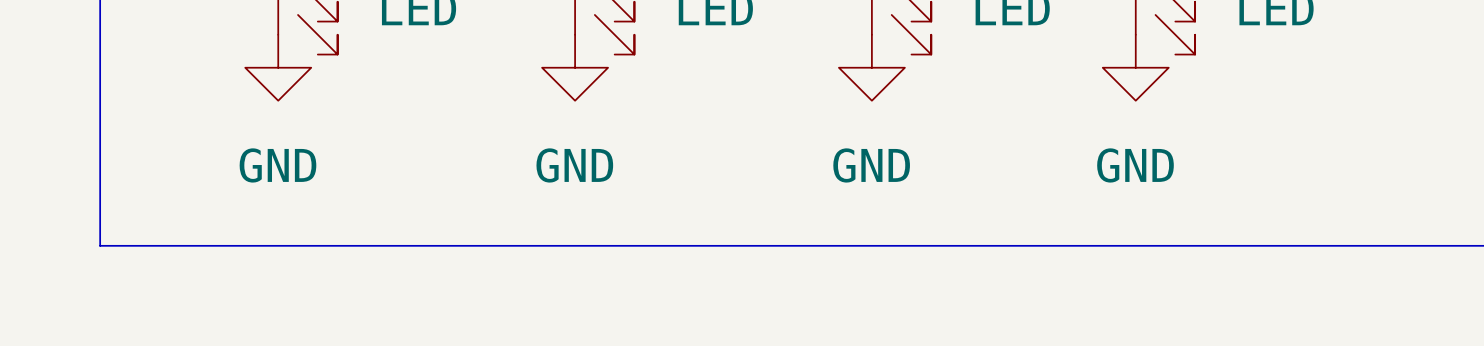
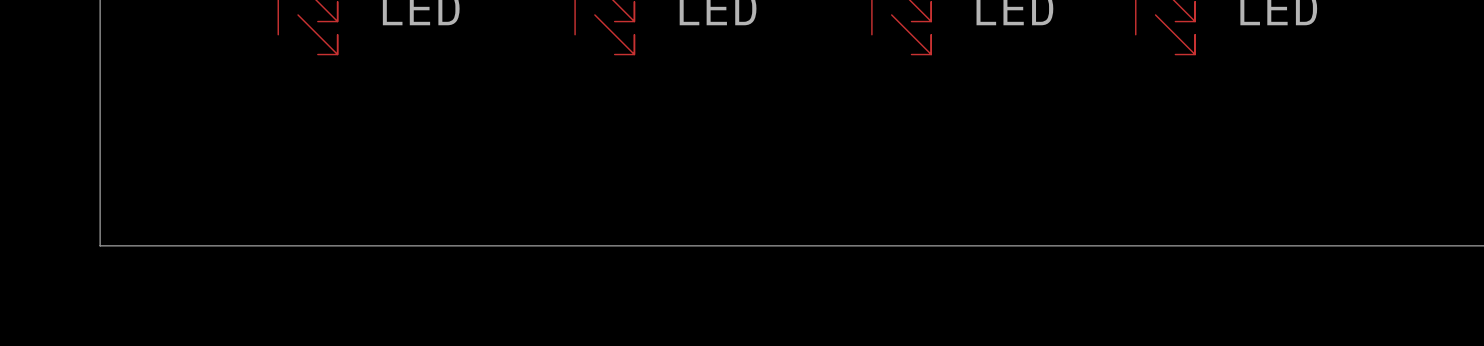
power symbol: GND (278, 67) -> none
power symbol: GND (575, 67) -> none
power symbol: GND (871, 67) -> none
power symbol: GND (1135, 67) -> none

